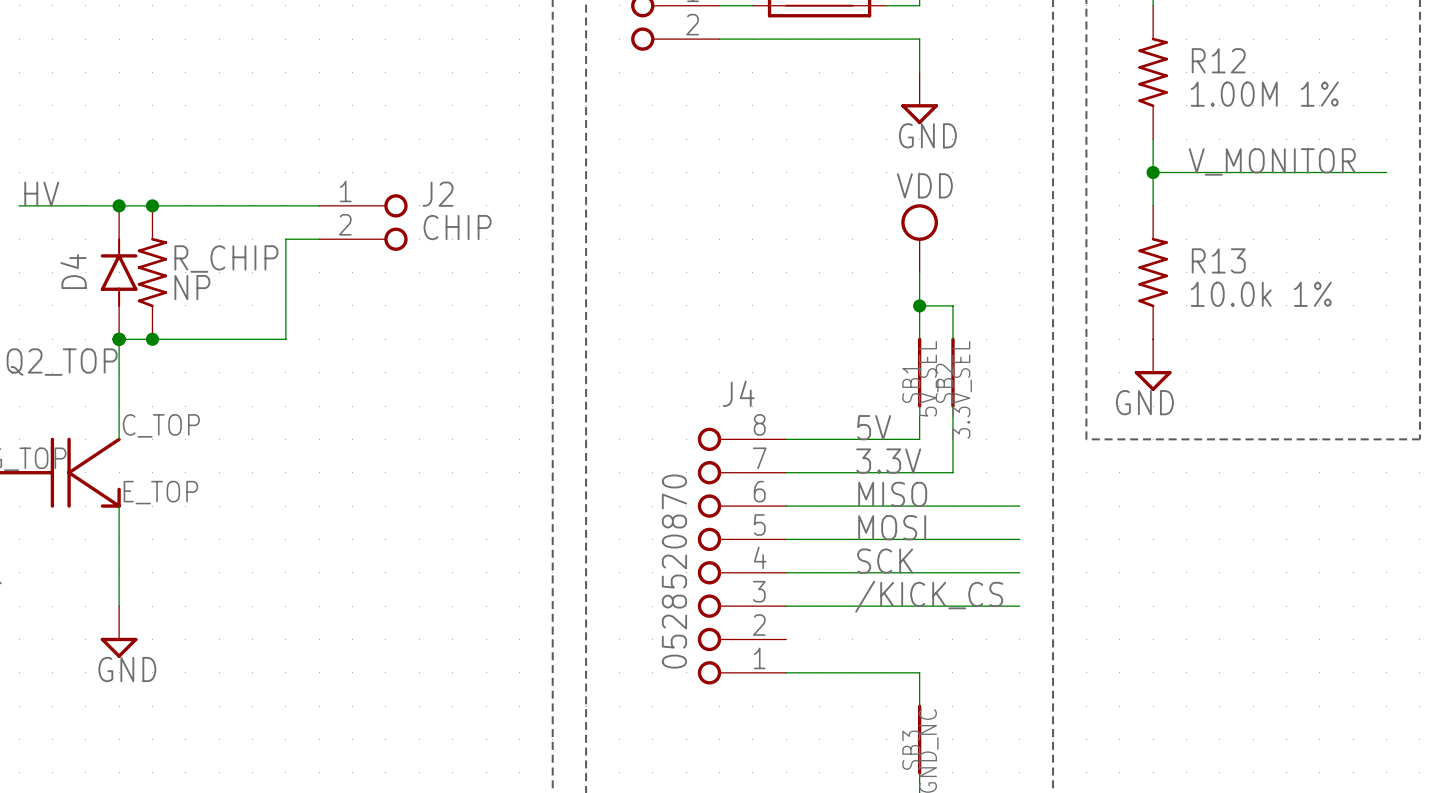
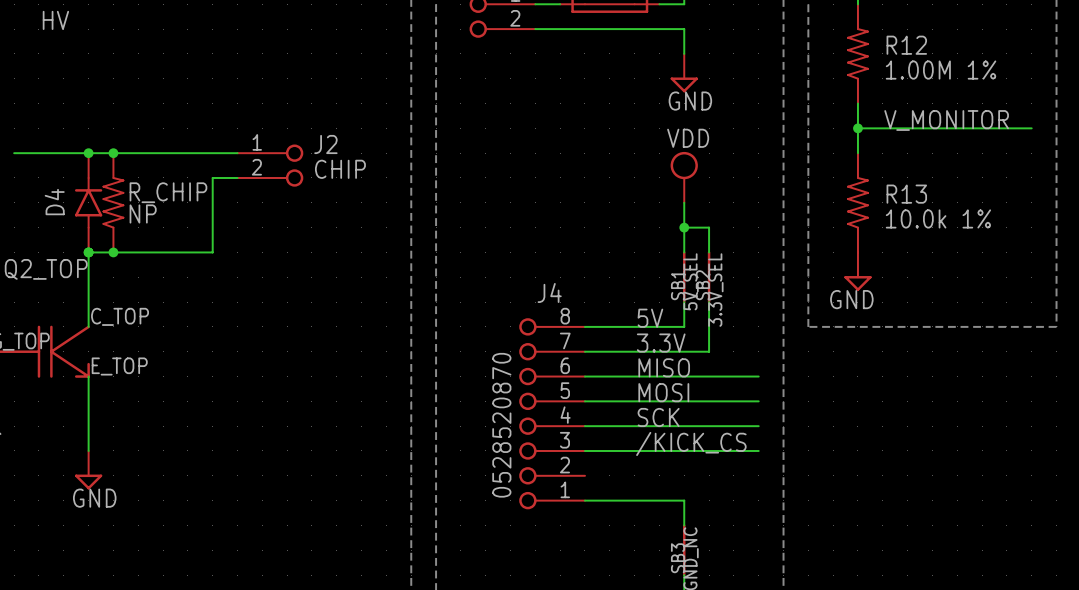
label position: HV (41, 194) -> HV (55, 20)

